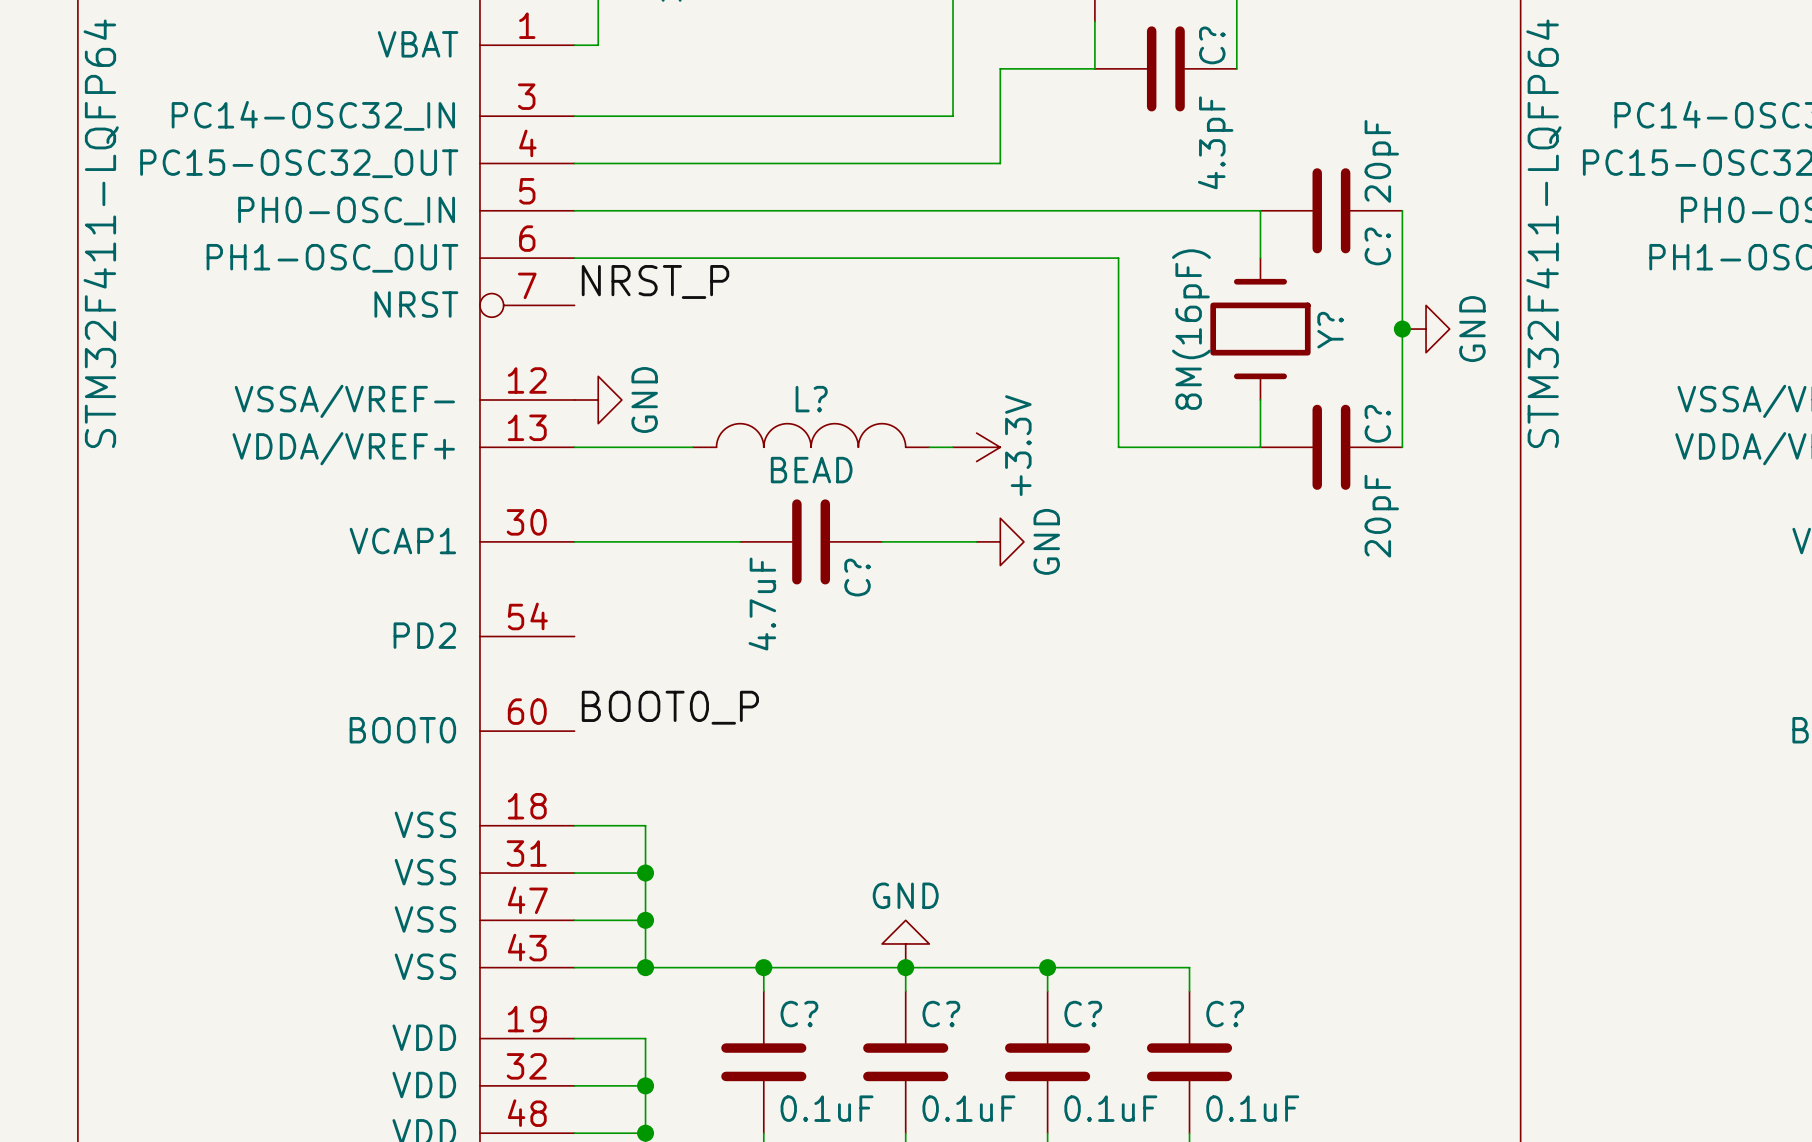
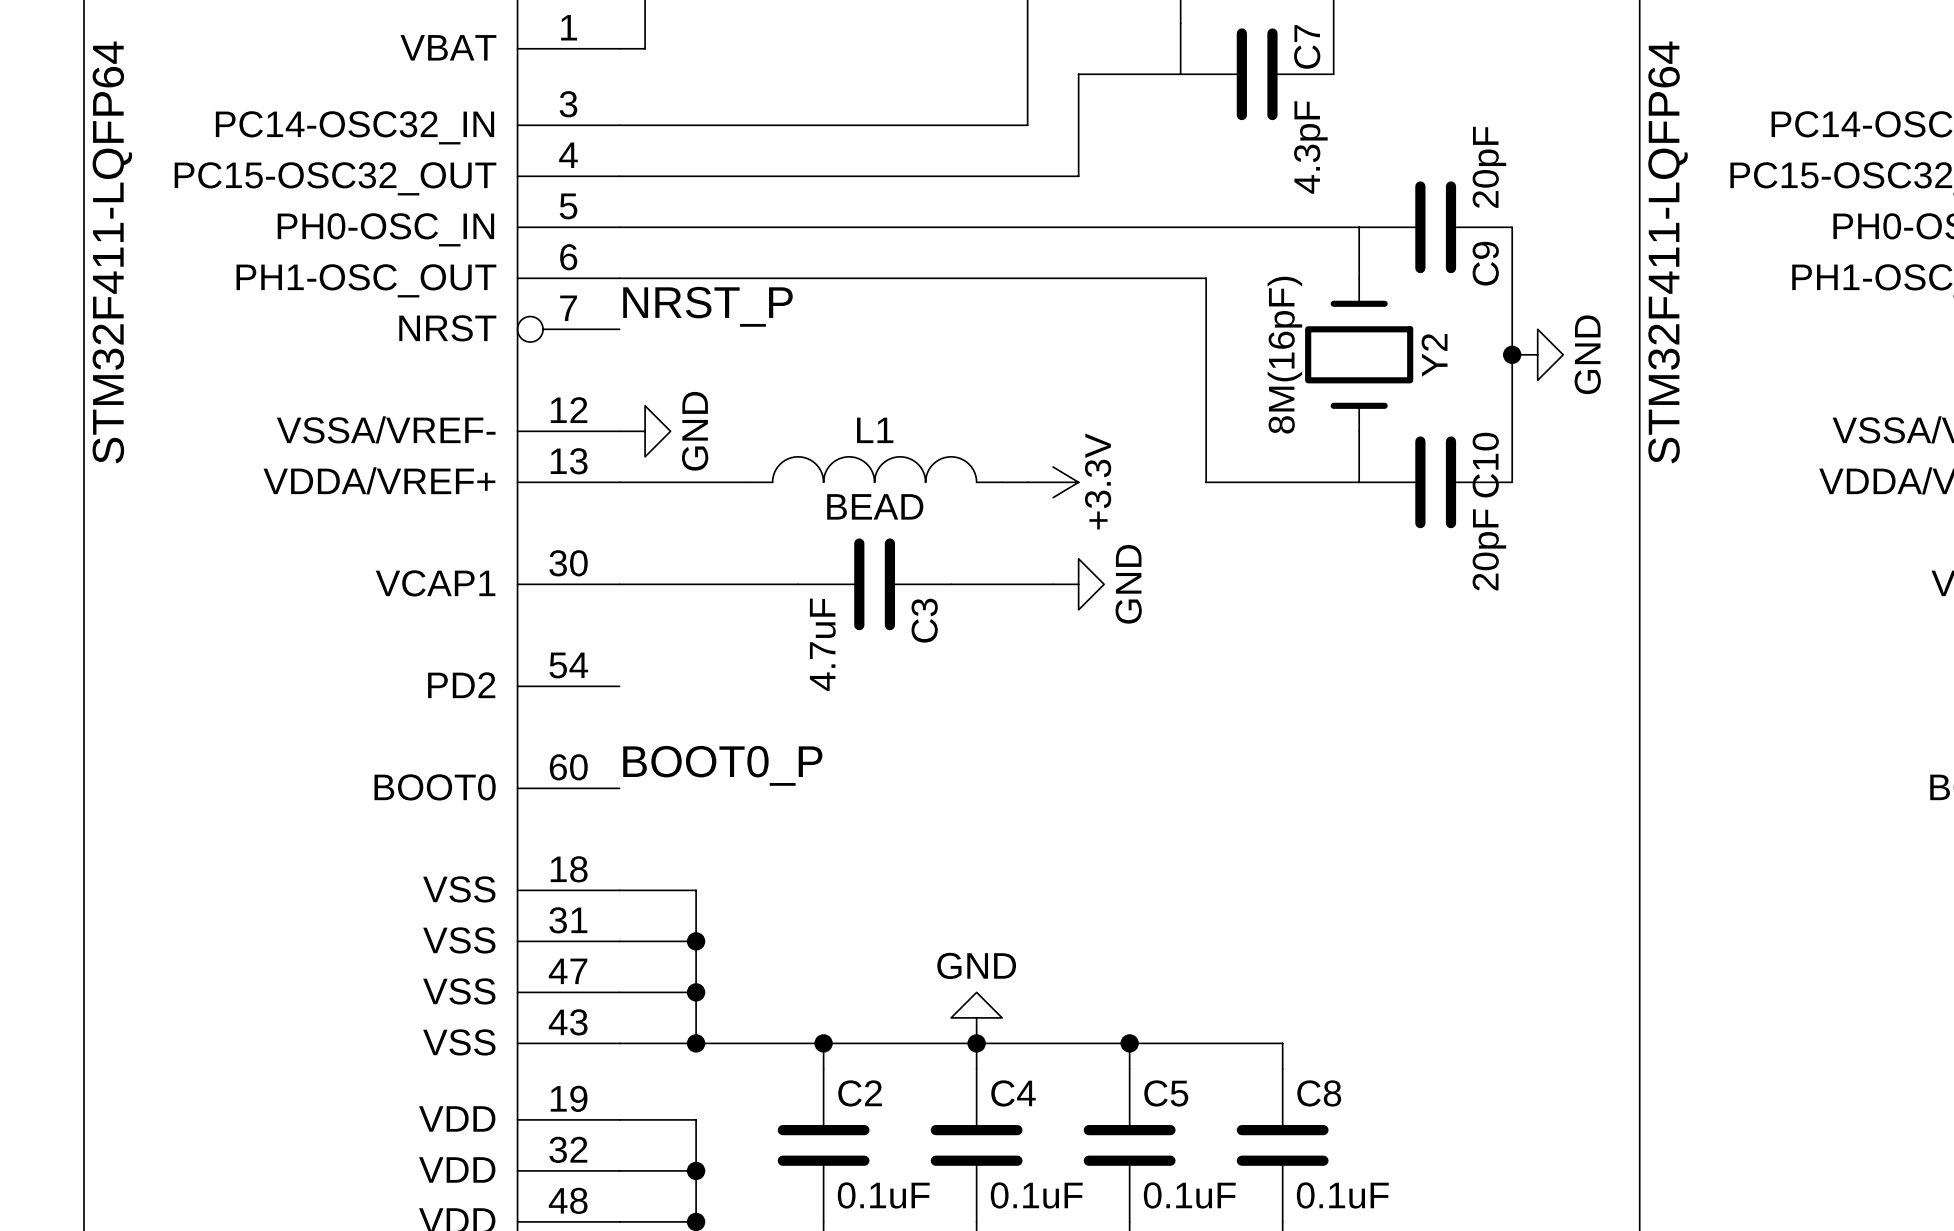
C? name: C? (1212, 45) -> C7 (1307, 46)
C? name: C? (1377, 246) -> C9 (1485, 263)
Y? name: Y? (1330, 330) -> Y2 (1434, 355)
L? name: L? (811, 399) -> L1 (875, 430)
C? name: C? (1377, 423) -> C10 (1485, 465)
C? name: C? (857, 577) -> C3 (924, 620)
C? name: C? (799, 1014) -> C2 (860, 1093)
C? name: C? (941, 1014) -> C4 (1013, 1093)
C? name: C? (1083, 1014) -> C5 (1166, 1093)
C? name: C? (1225, 1014) -> C8 (1319, 1093)

